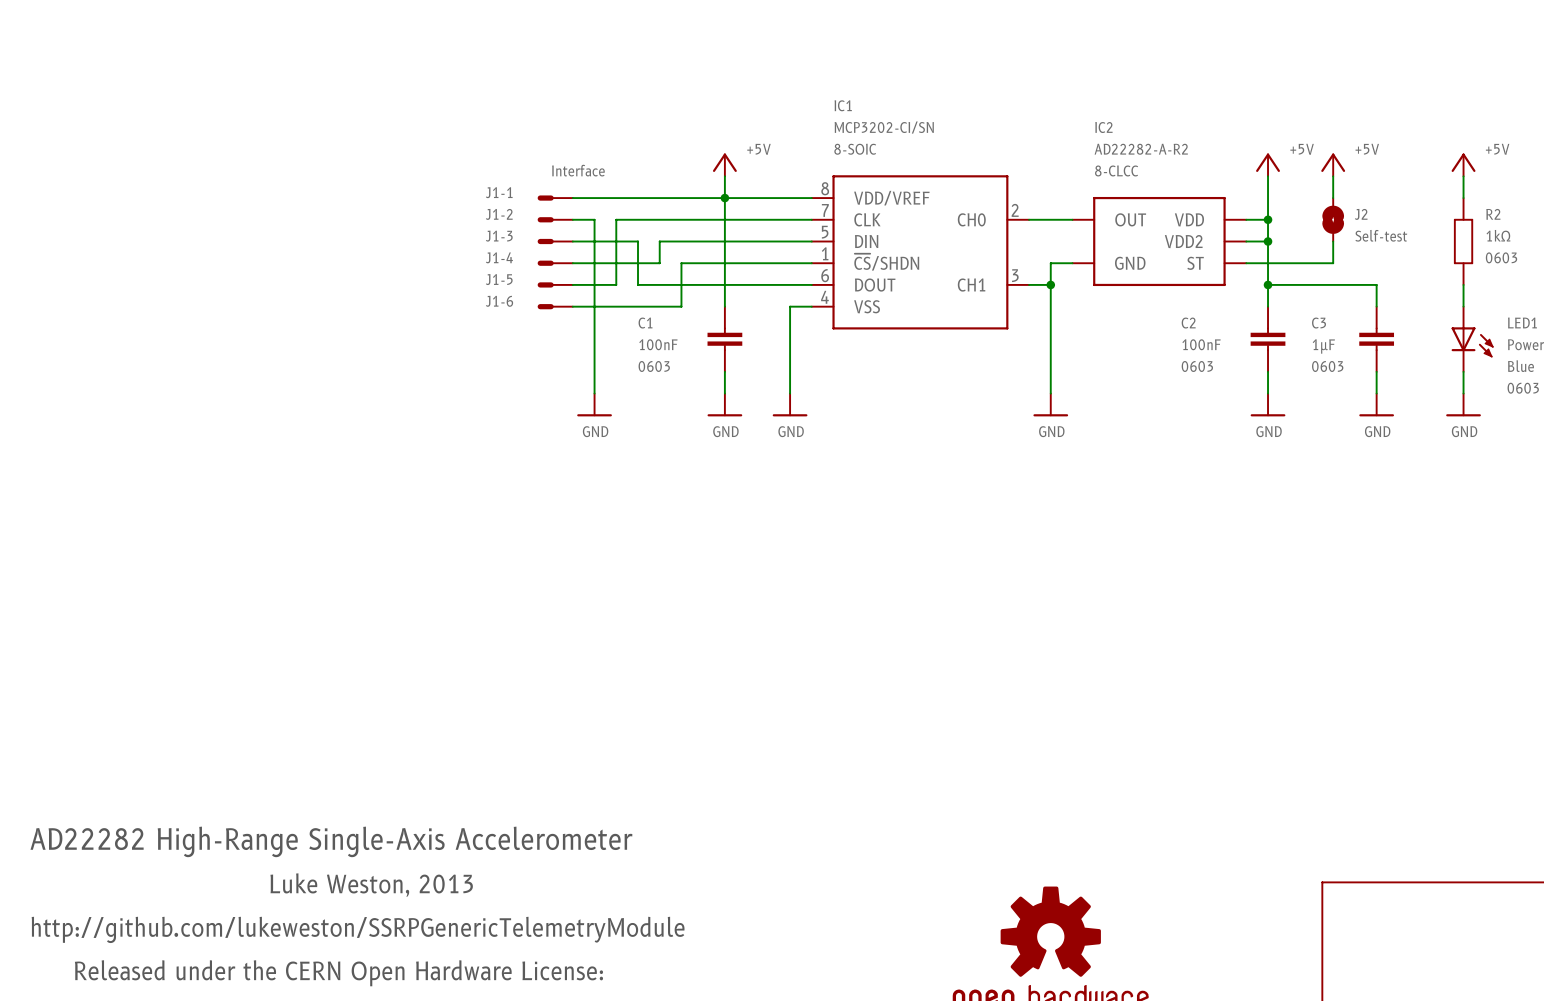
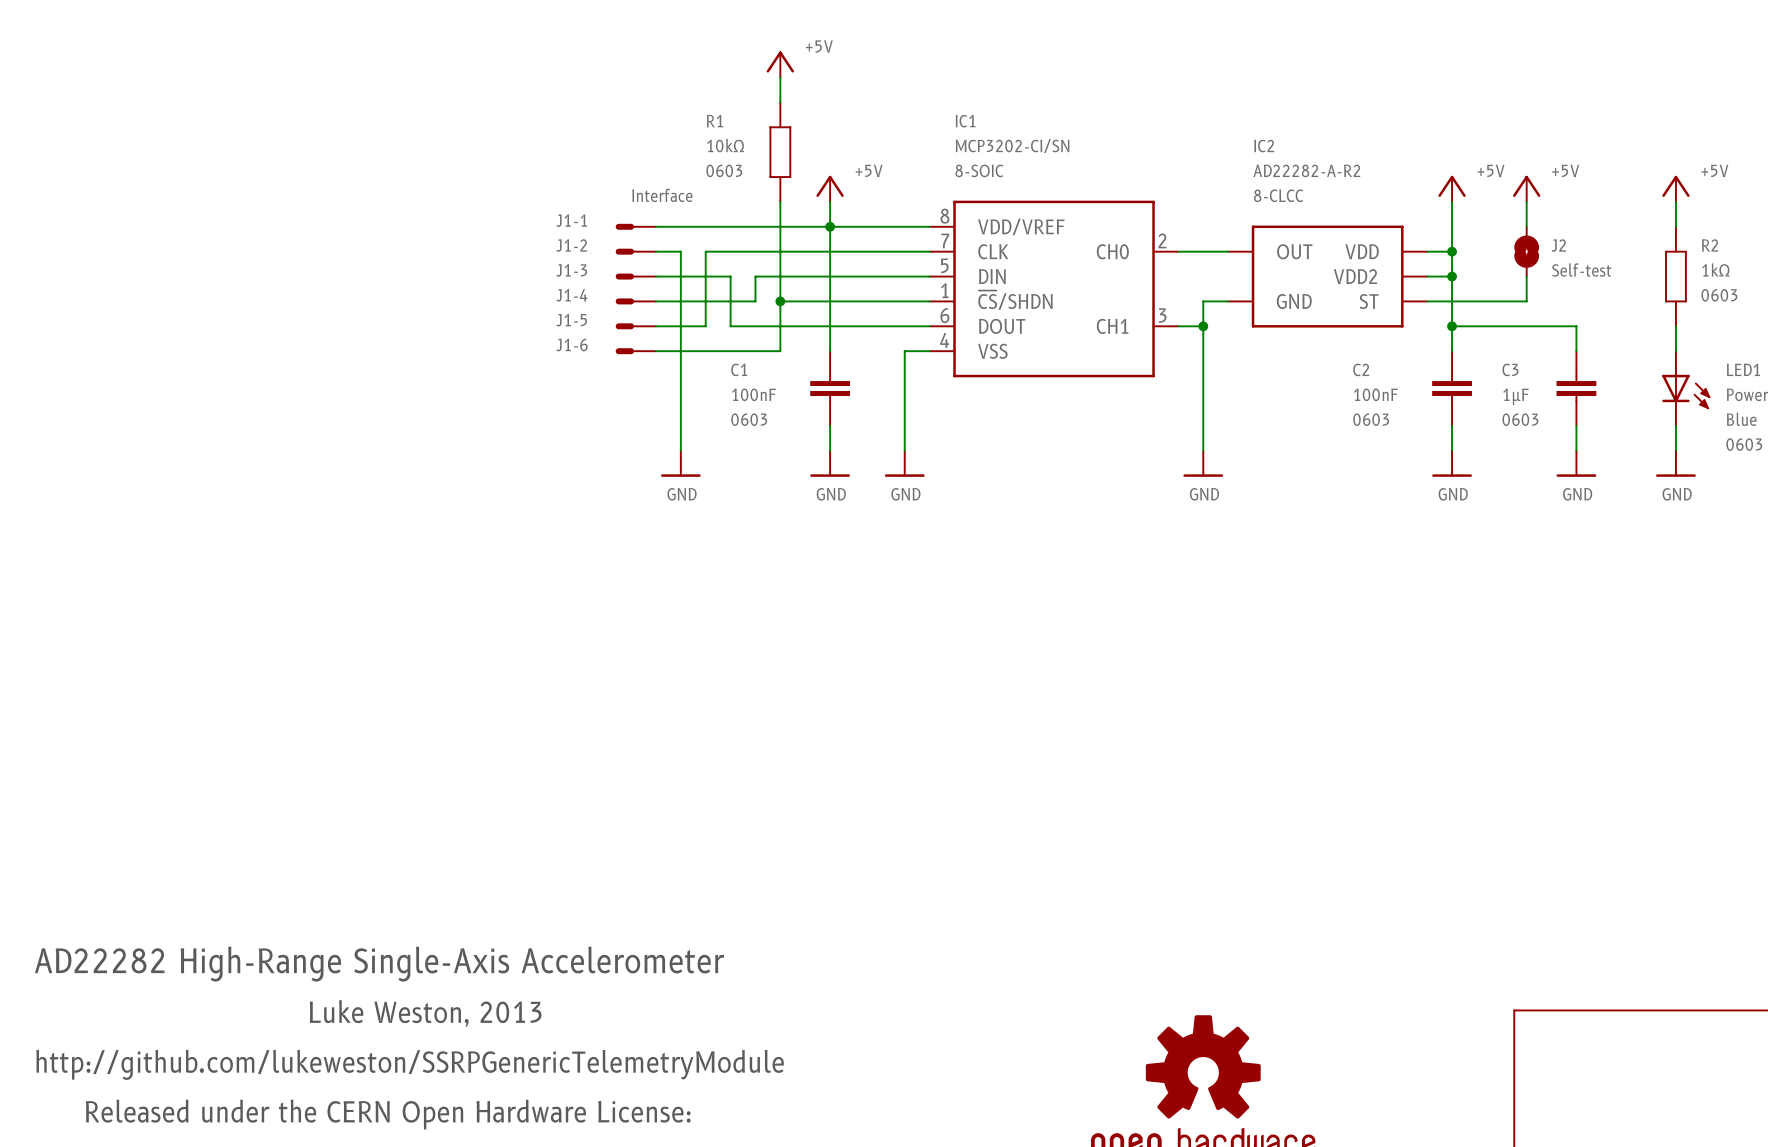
power symbol: none -> +5V (780, 64)
wire: none -> (780, 77) (780, 102)
R1: none -> 10kΩ (780, 152)
wire: none -> (780, 201) (780, 301)
junction: none -> (780, 301)

